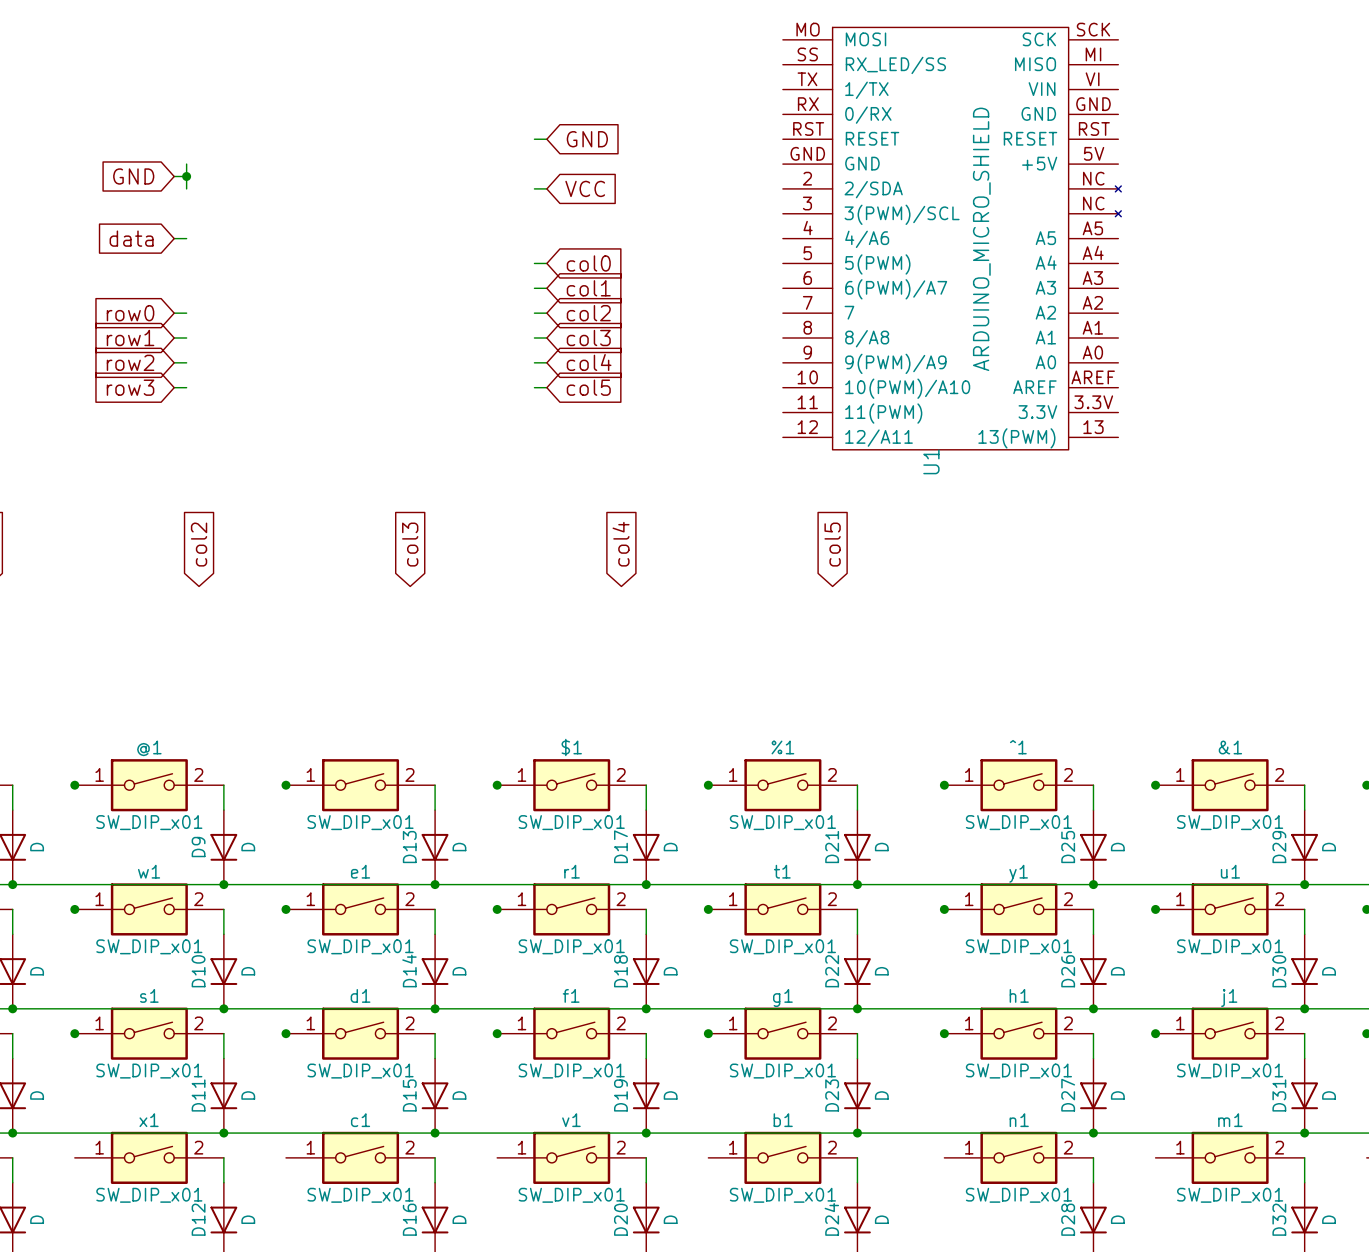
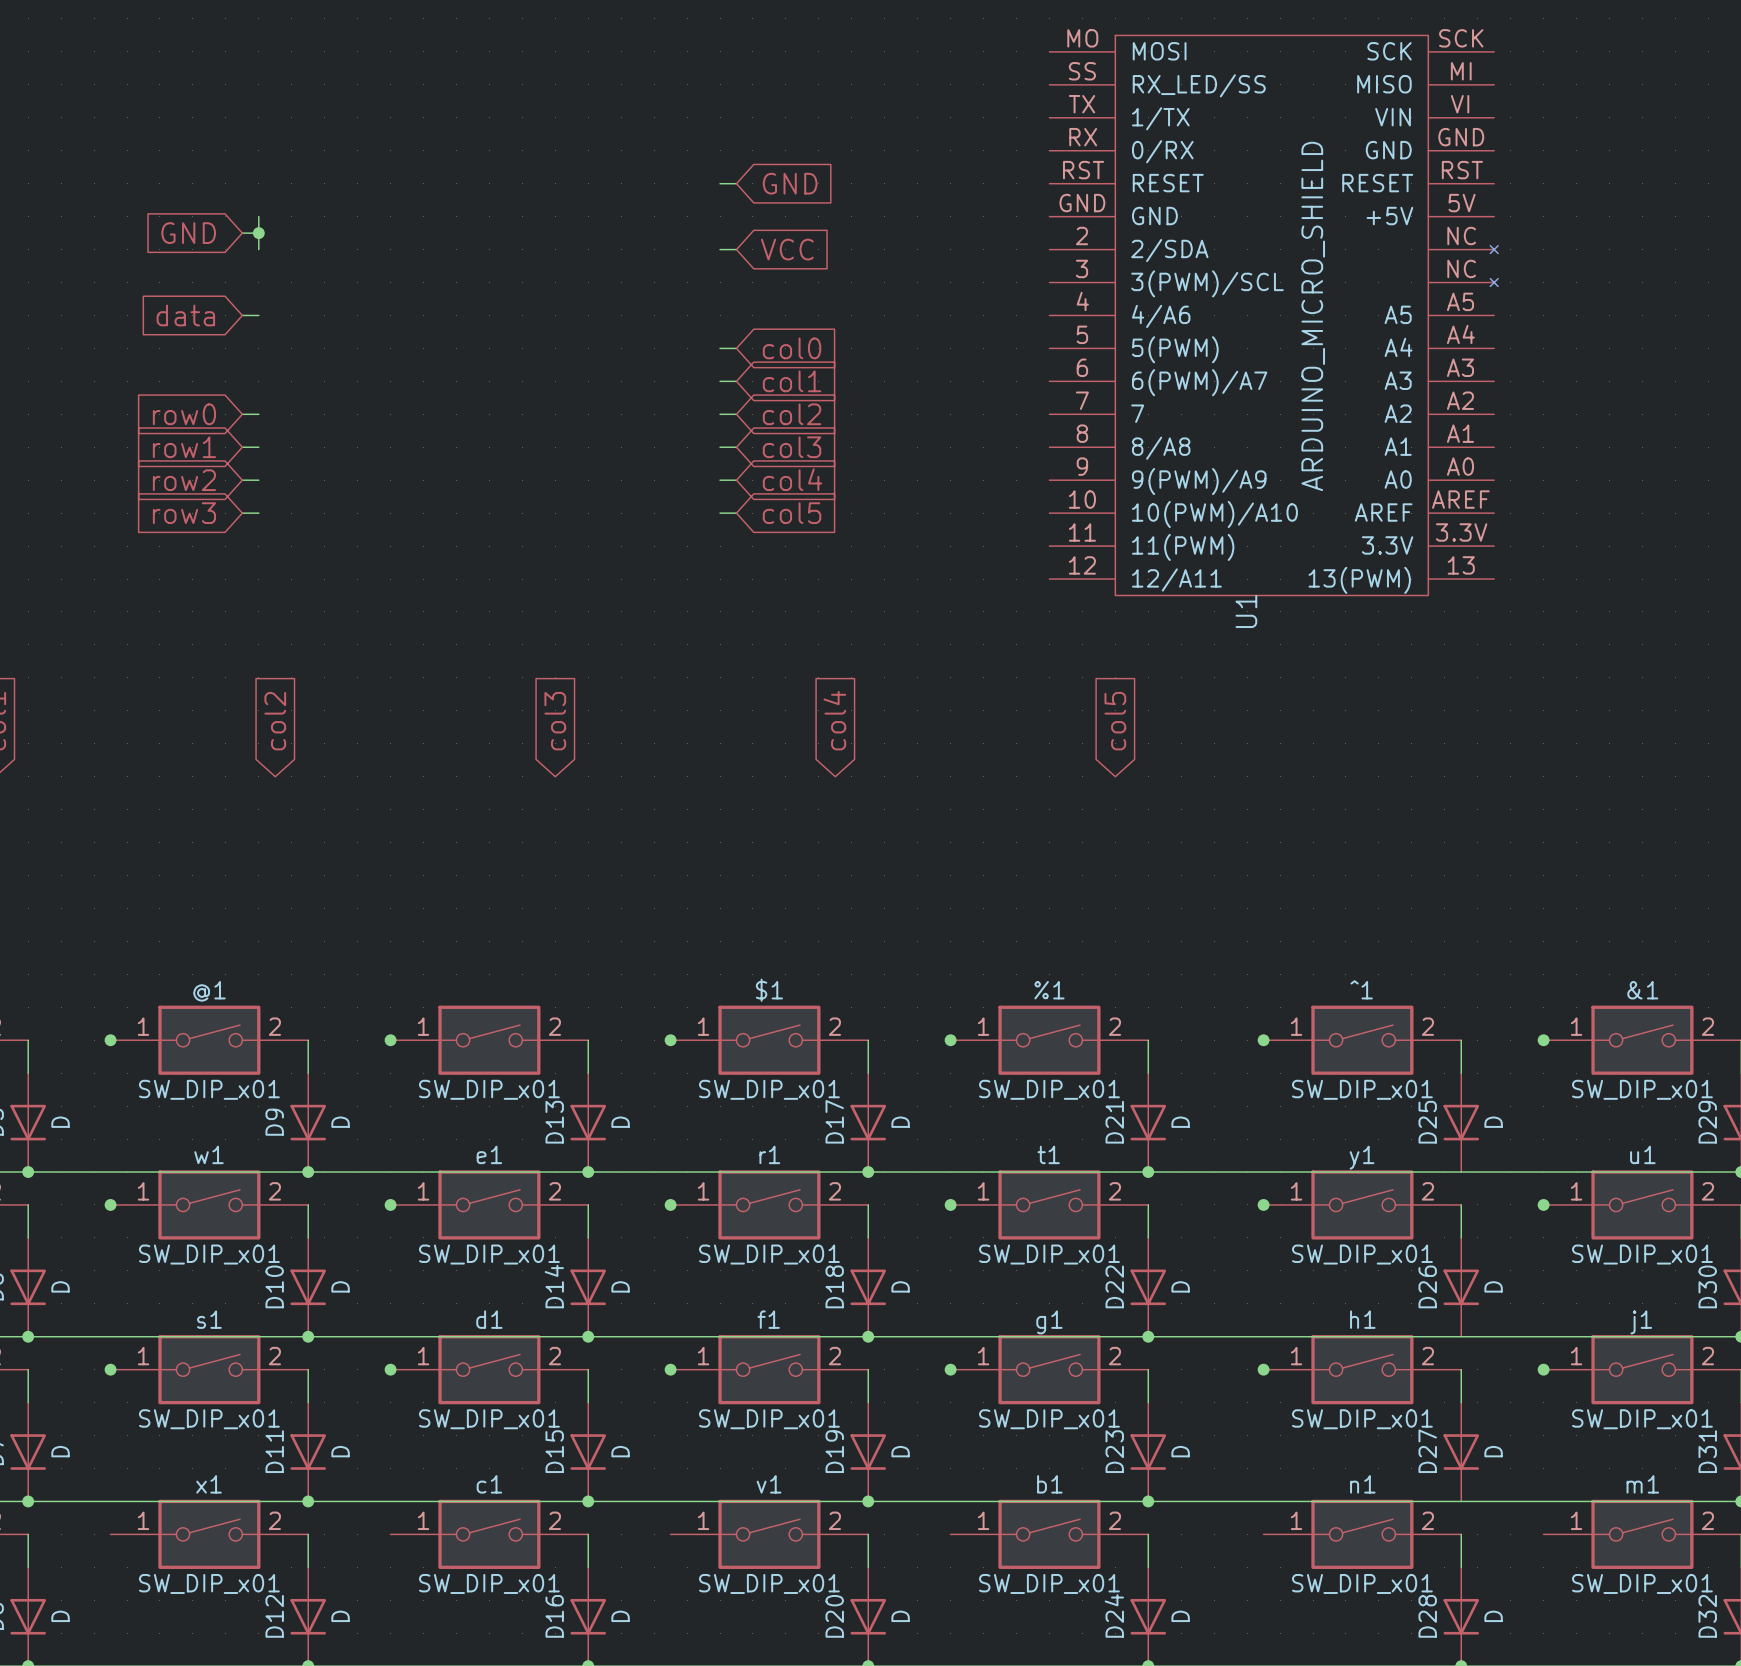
junction: (1093, 884) -> none
junction: (1093, 1008) -> none
junction: (1093, 1133) -> none

